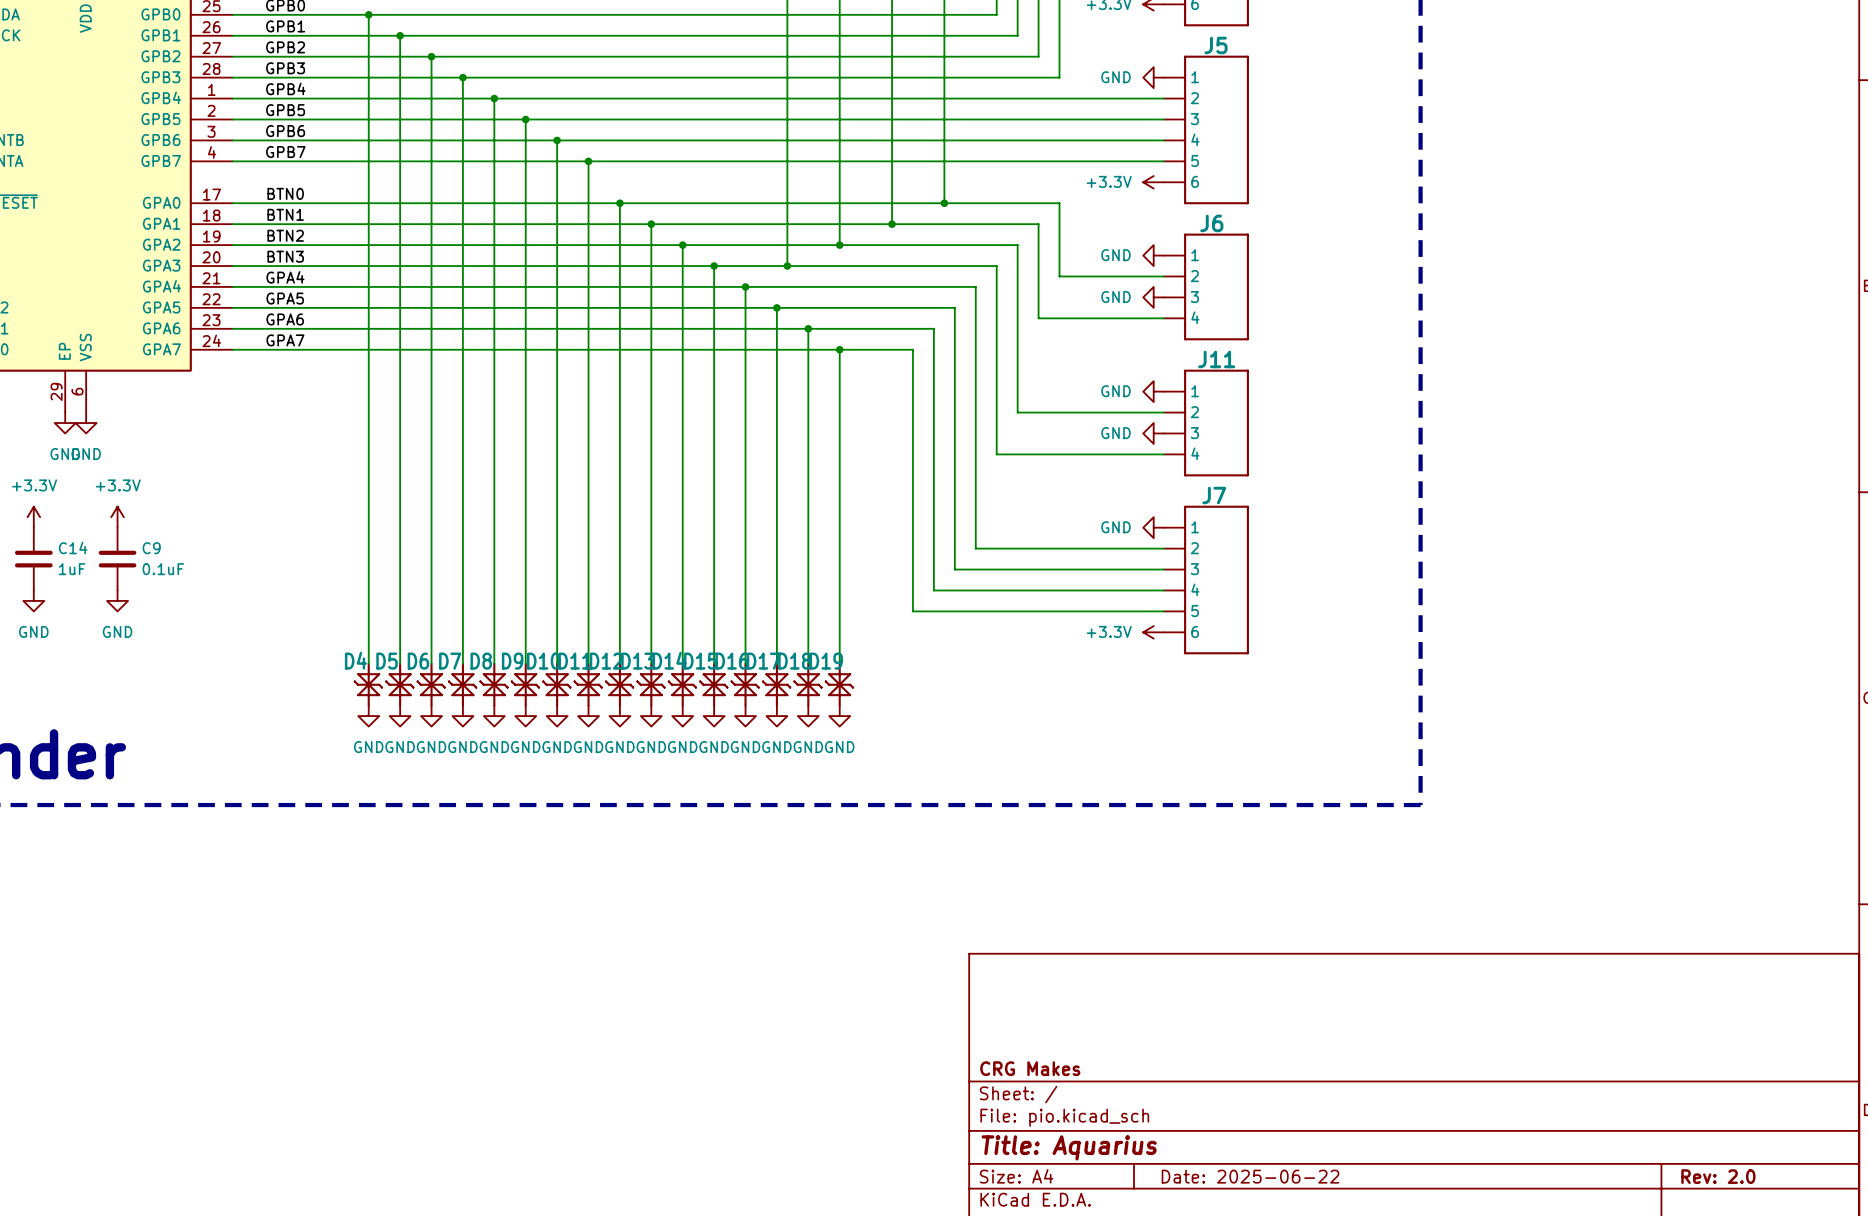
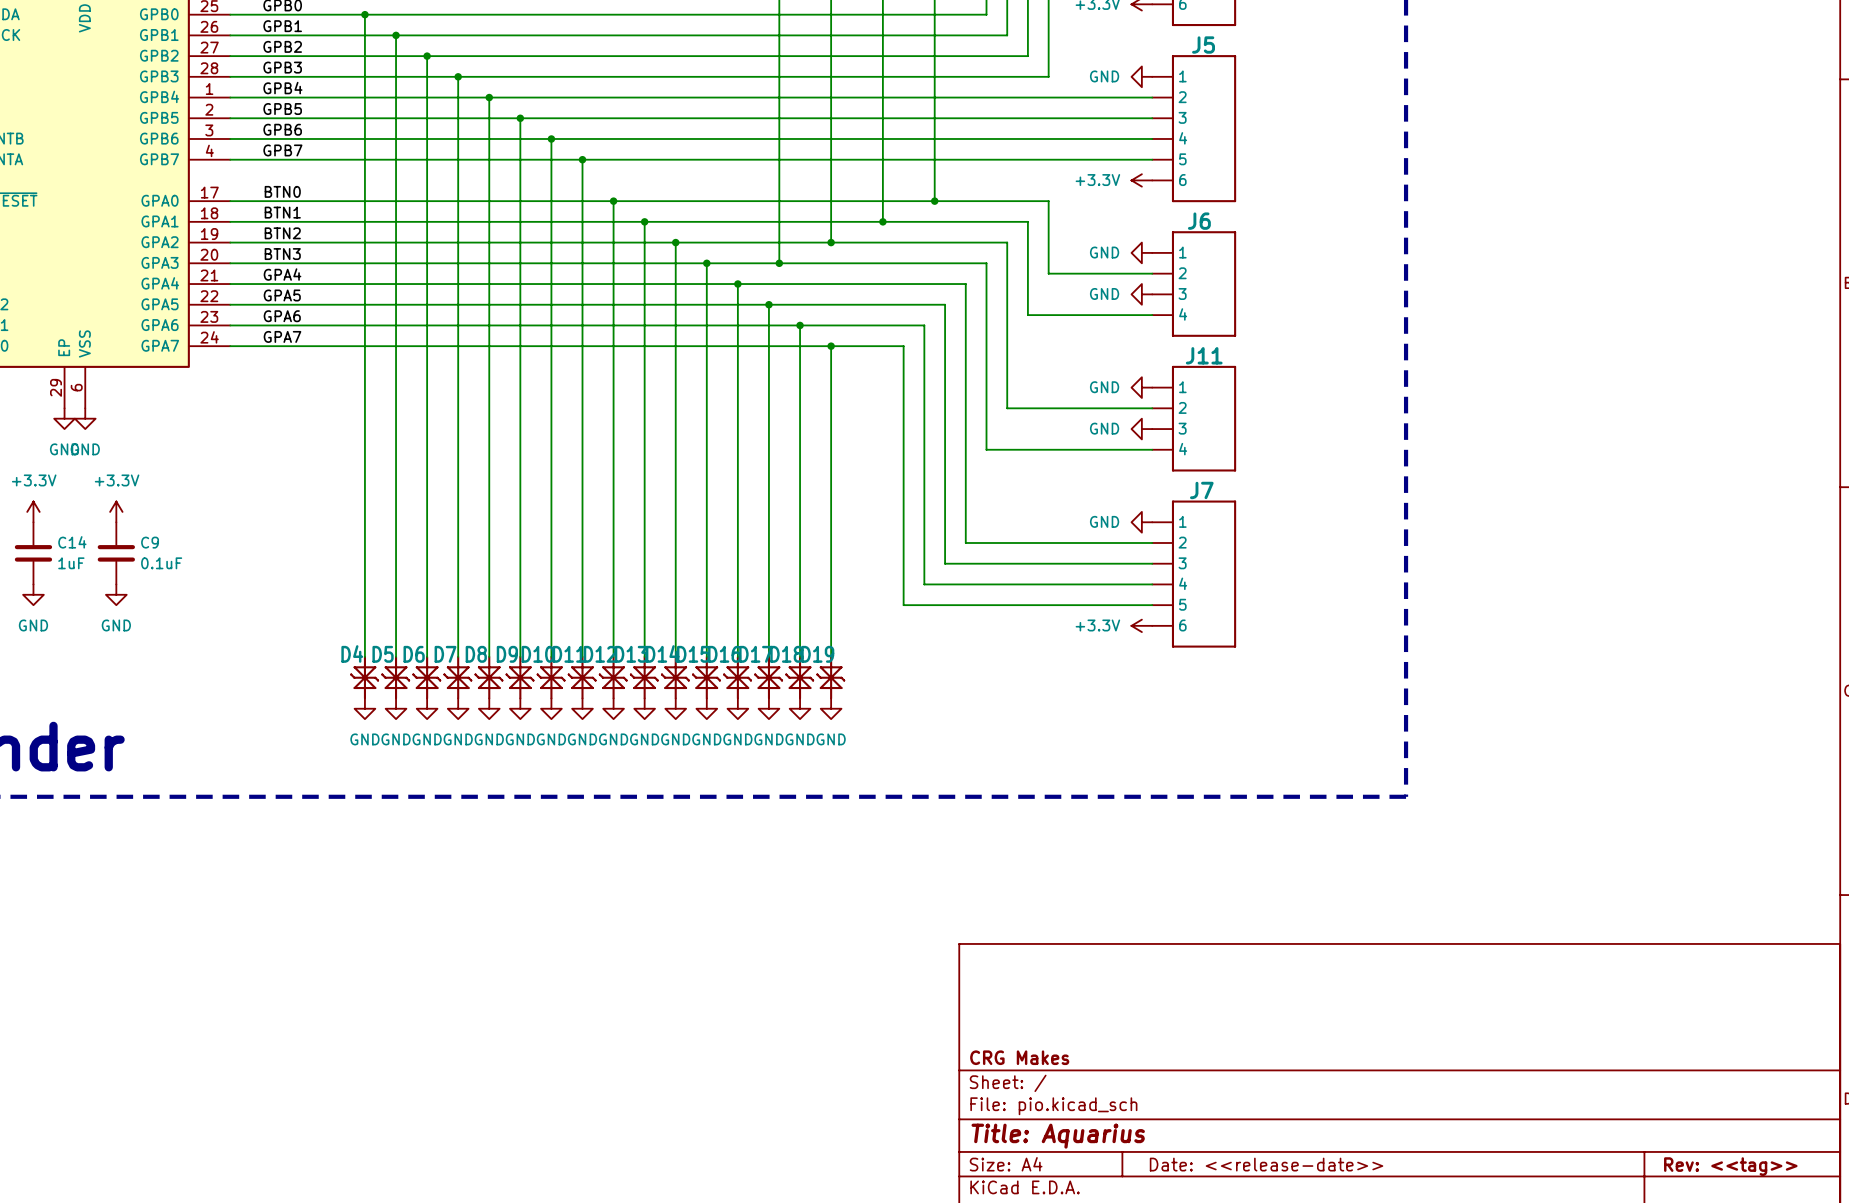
title block: Date: 2025-06-22 (1250, 1176) -> Date: <<release-date>> (1266, 1164)
title block: Rev: 2.0 (1718, 1176) -> Rev: <<tag>> (1730, 1166)

